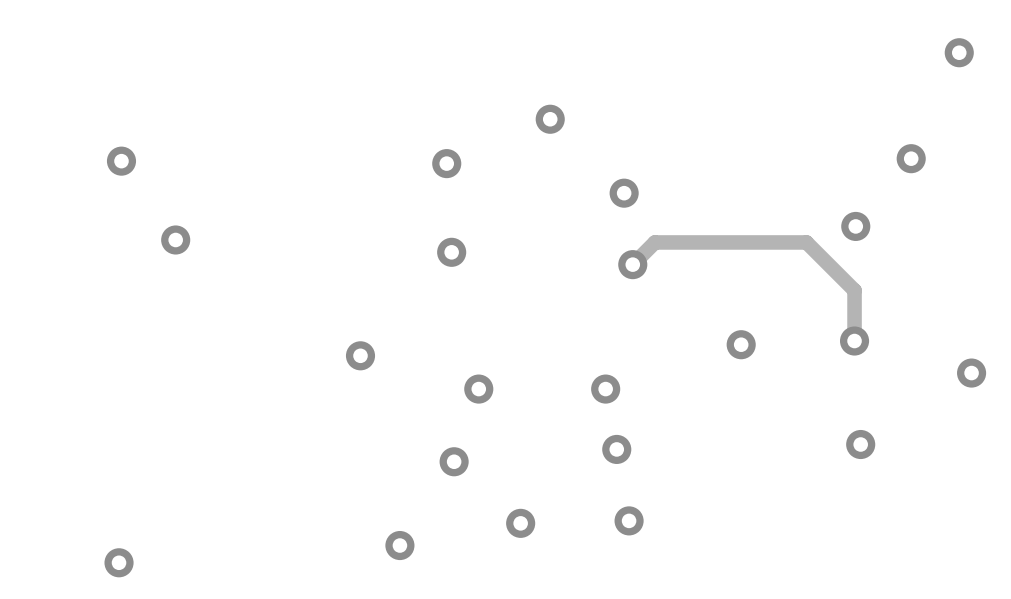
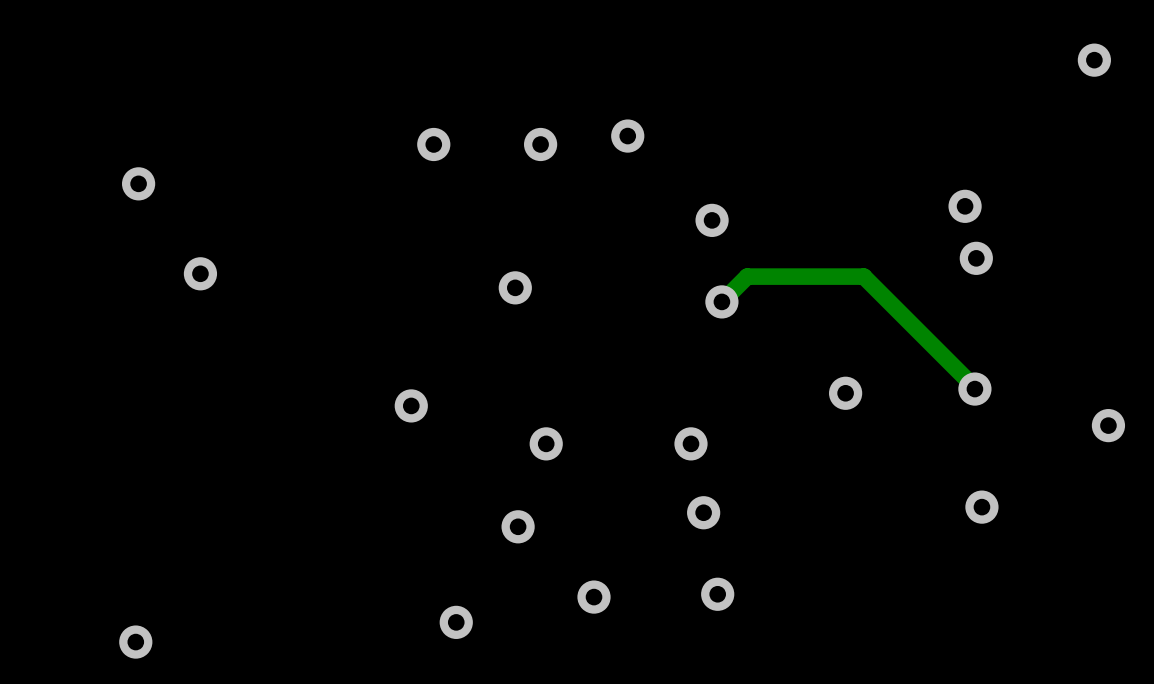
via: none -> (433, 144)
via: none -> (540, 144)
via position: (911, 158) -> (965, 206)
via: (446, 163) -> none
track: (757, 242) (806, 242) (854, 290) (854, 339) -> (863, 276) (974, 387)

